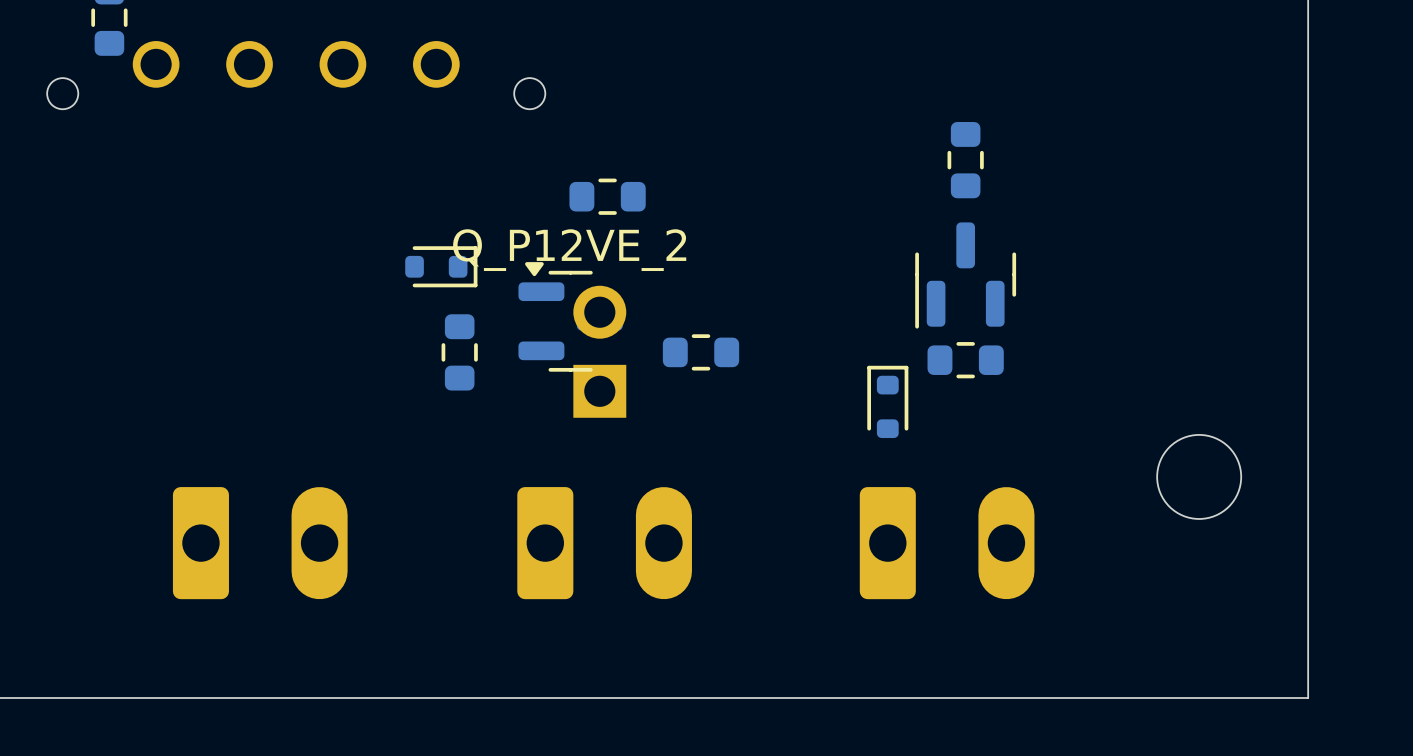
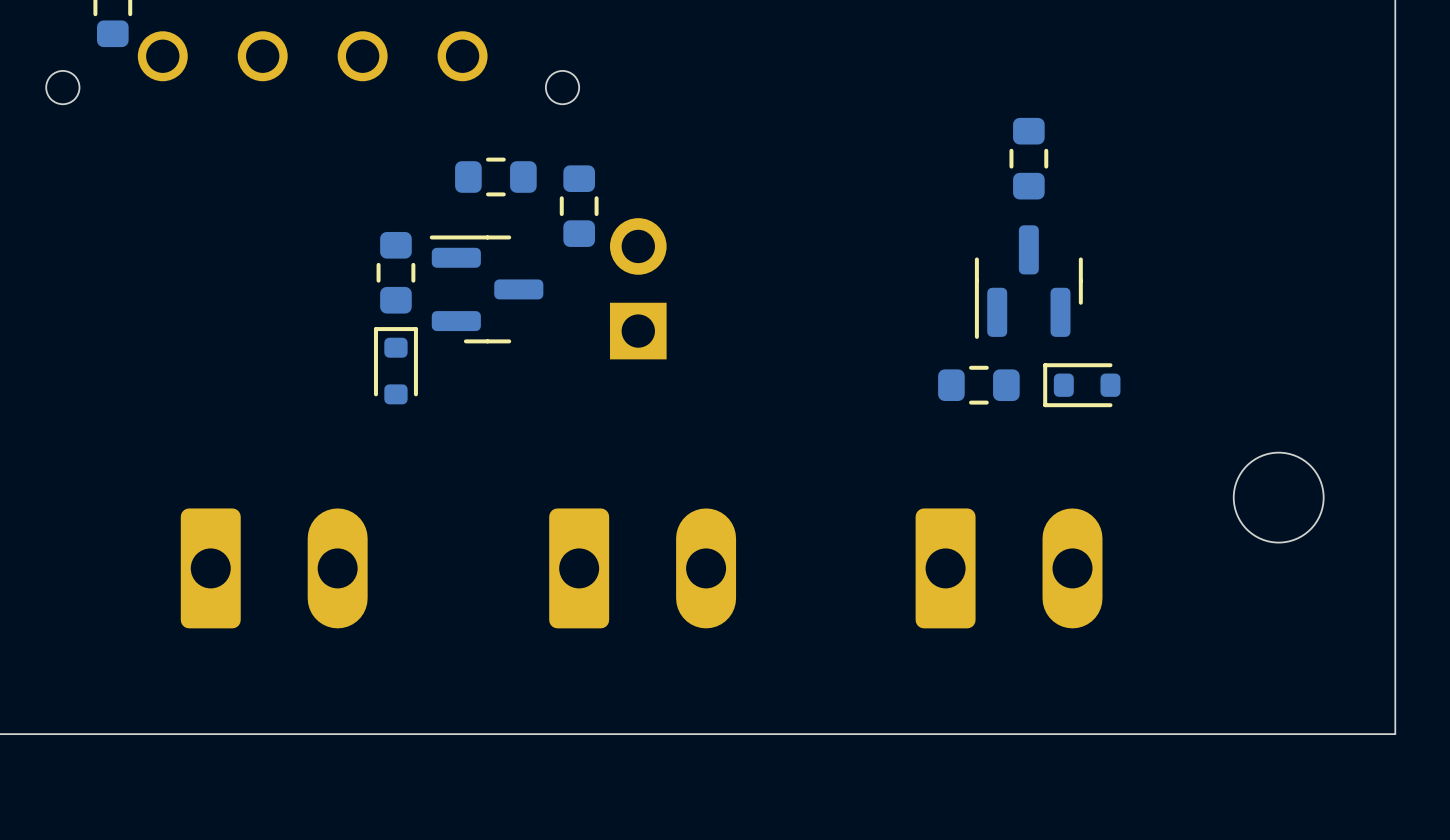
part: none -> (495, 177)
part rotation: 0° (607, 196) -> 90° clockwise (579, 206)
part position: (607, 196) -> (579, 206)
part footprint: [405, 246, 478, 288] -> [429, 235, 544, 344]
part: none -> (395, 272)
Q_P12VE_2: (570, 316) -> none
part position: (599, 351) -> (638, 288)
part: (459, 352) -> none
part: (701, 352) -> none
part: none -> (395, 365)
part position: (965, 360) -> (978, 385)
part rotation: 0° (887, 401) -> 90° counterclockwise (1081, 385)
part position: (887, 401) -> (1081, 385)

